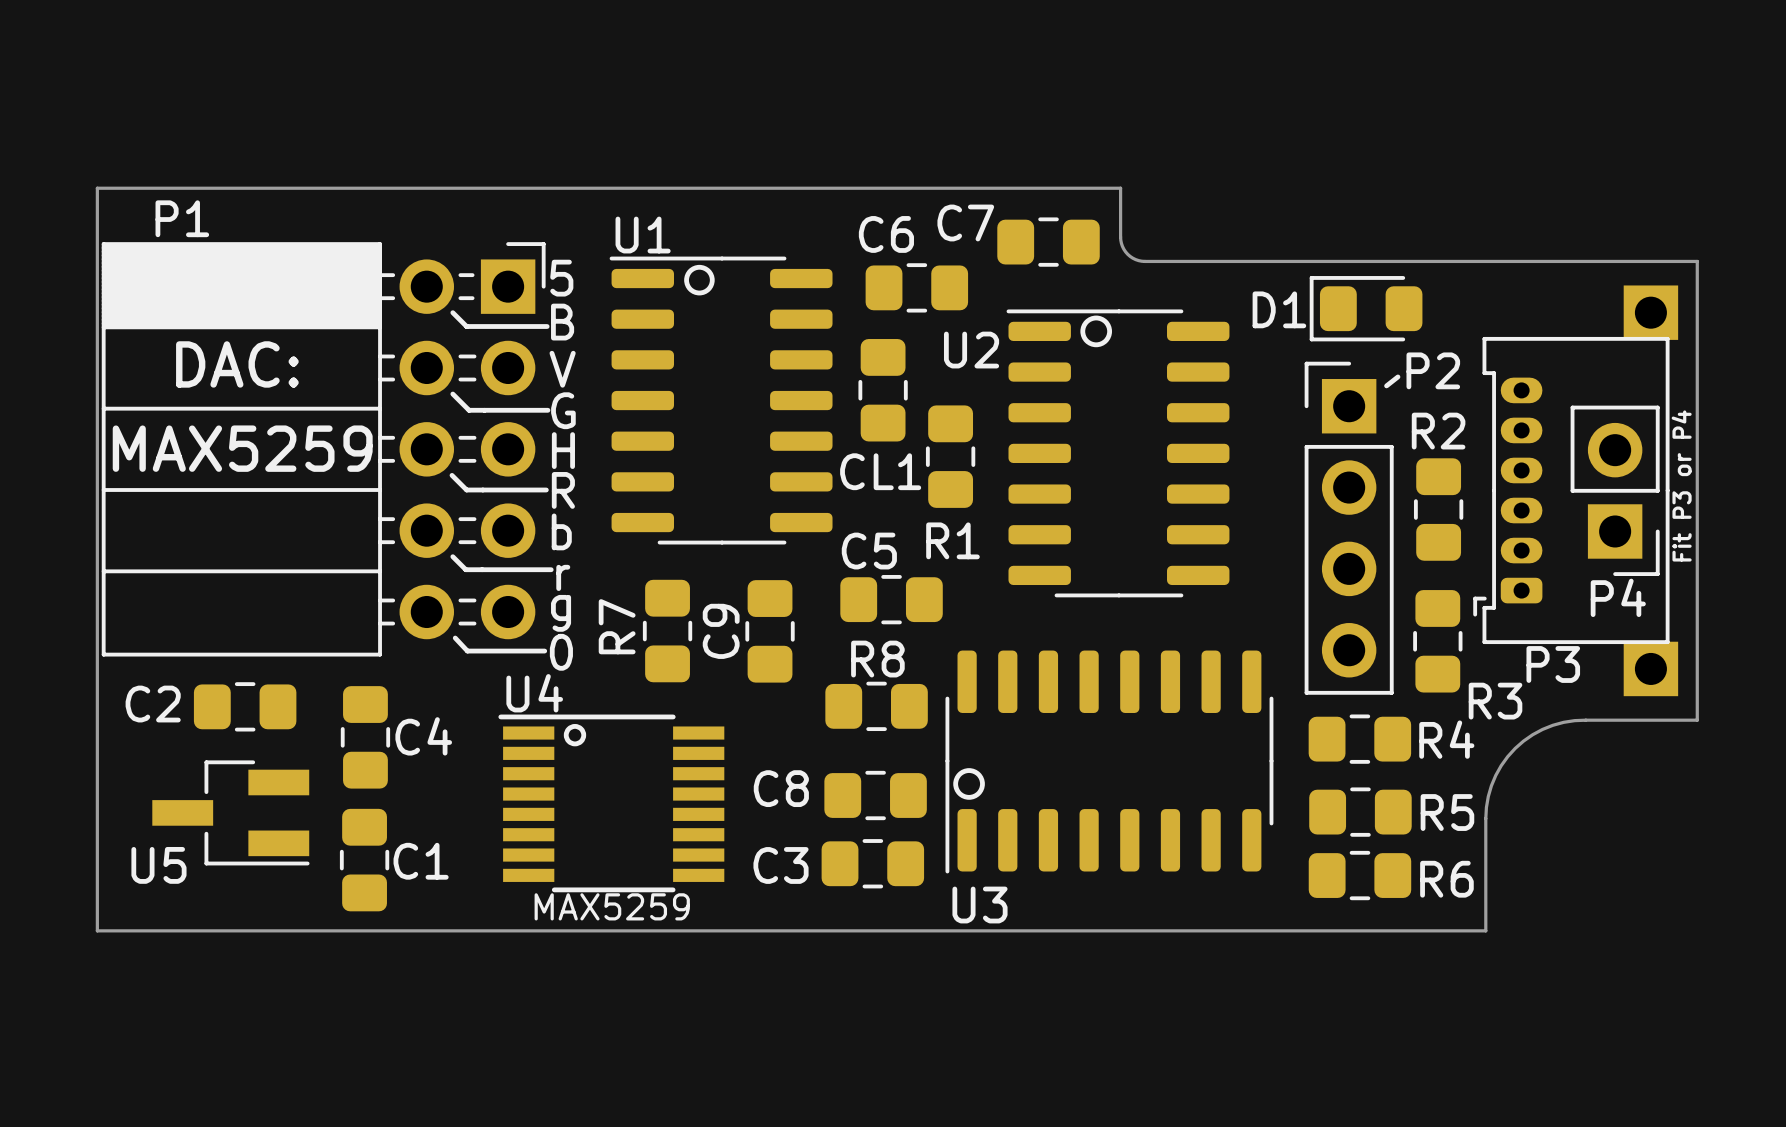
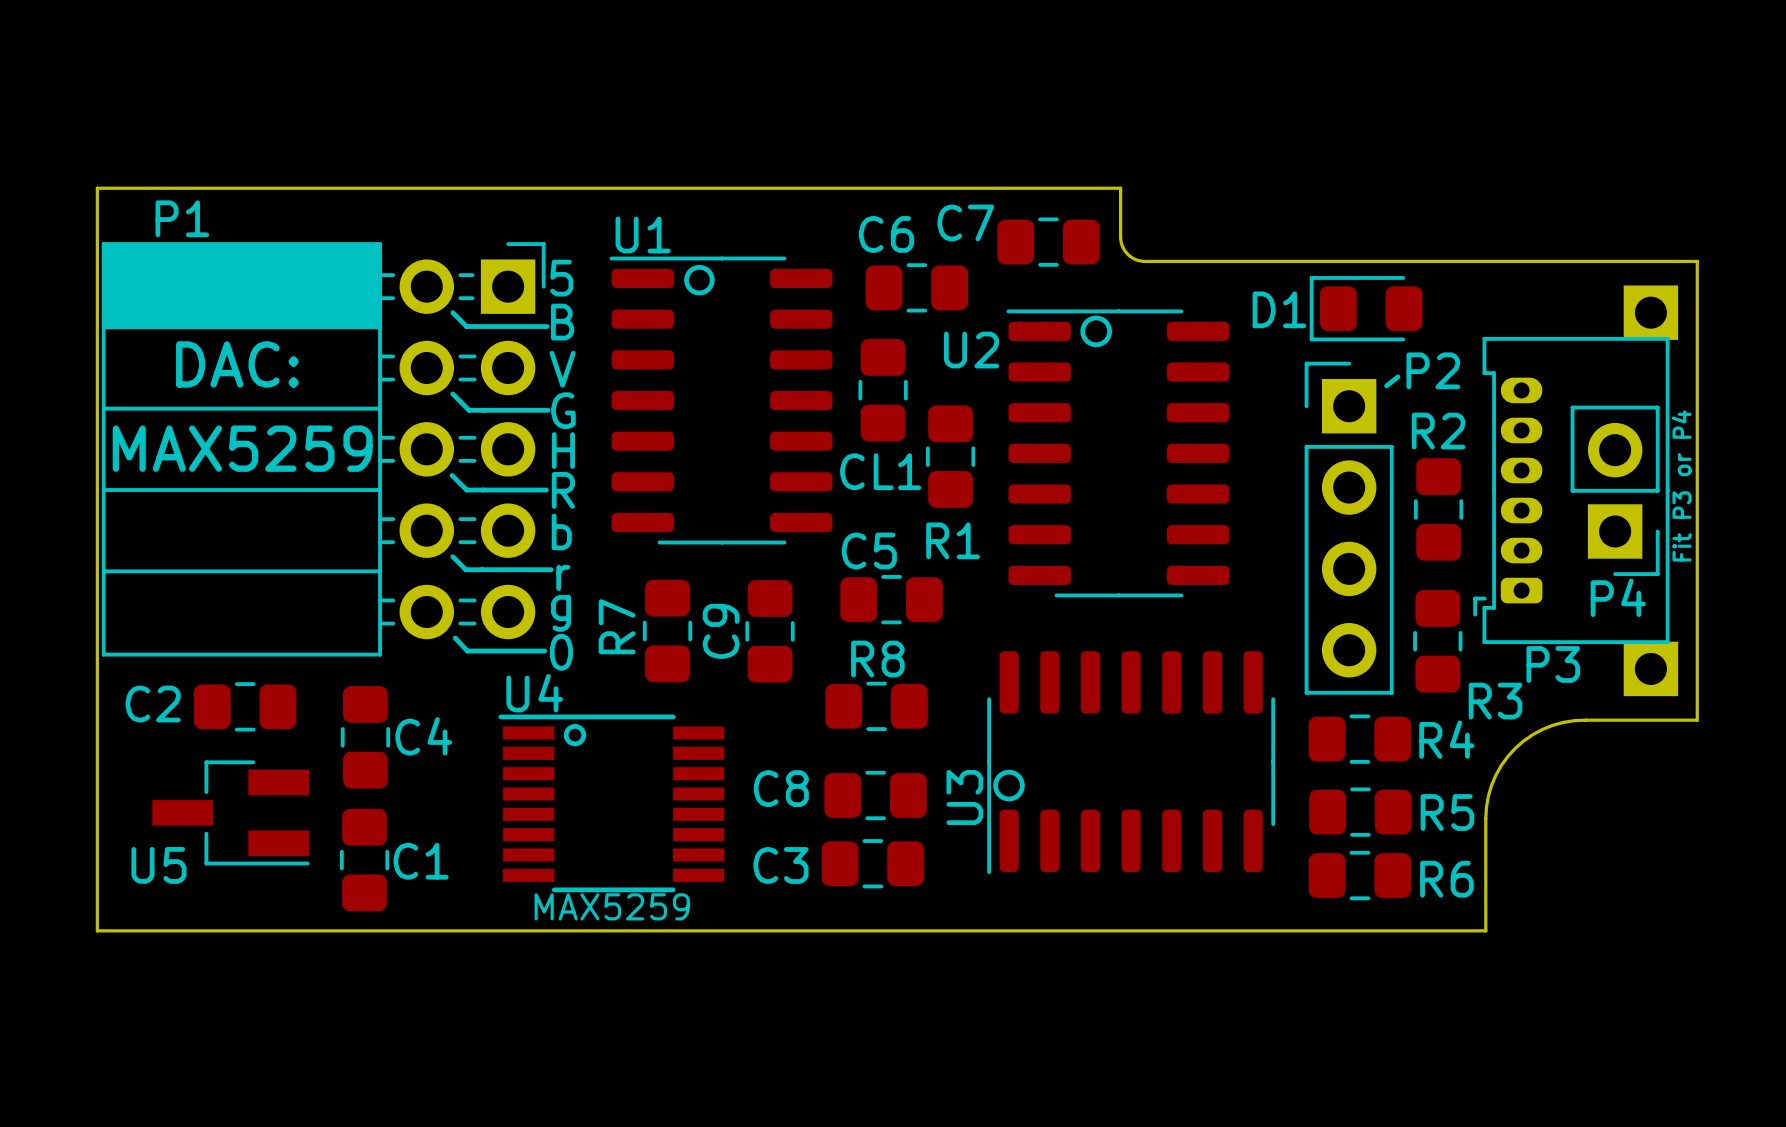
U3 footprint: [945, 650, 1274, 874] -> [987, 651, 1276, 875]
drawing position: (969, 783) -> (1009, 785)
U3 name position: U3 (979, 905) -> U3 (964, 797)

